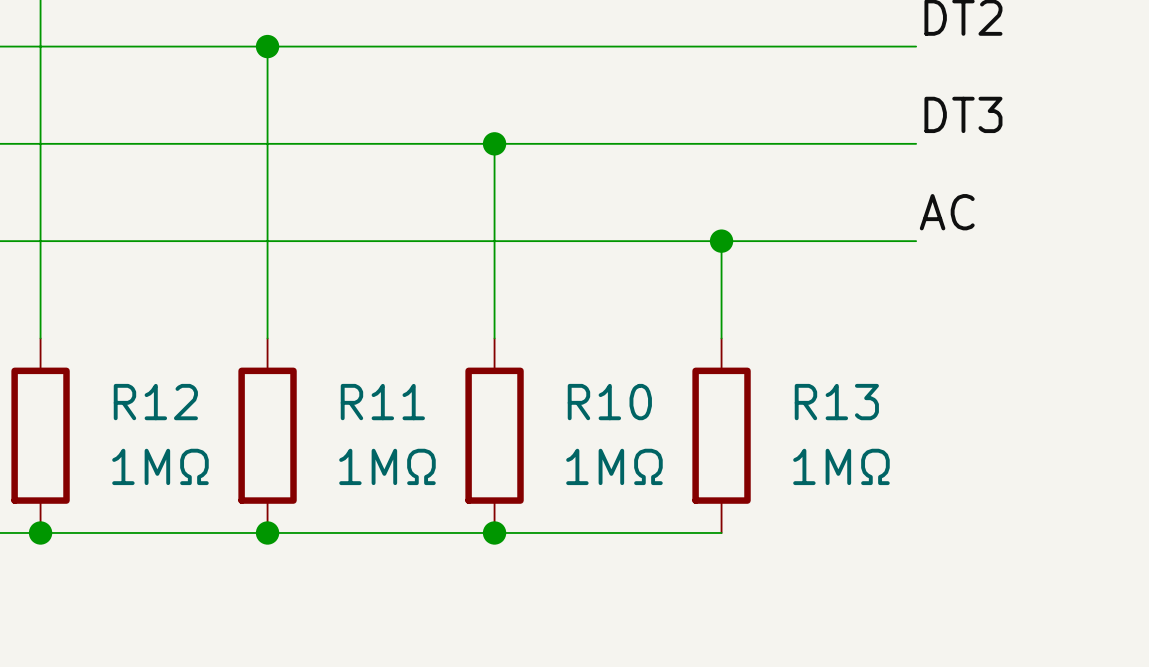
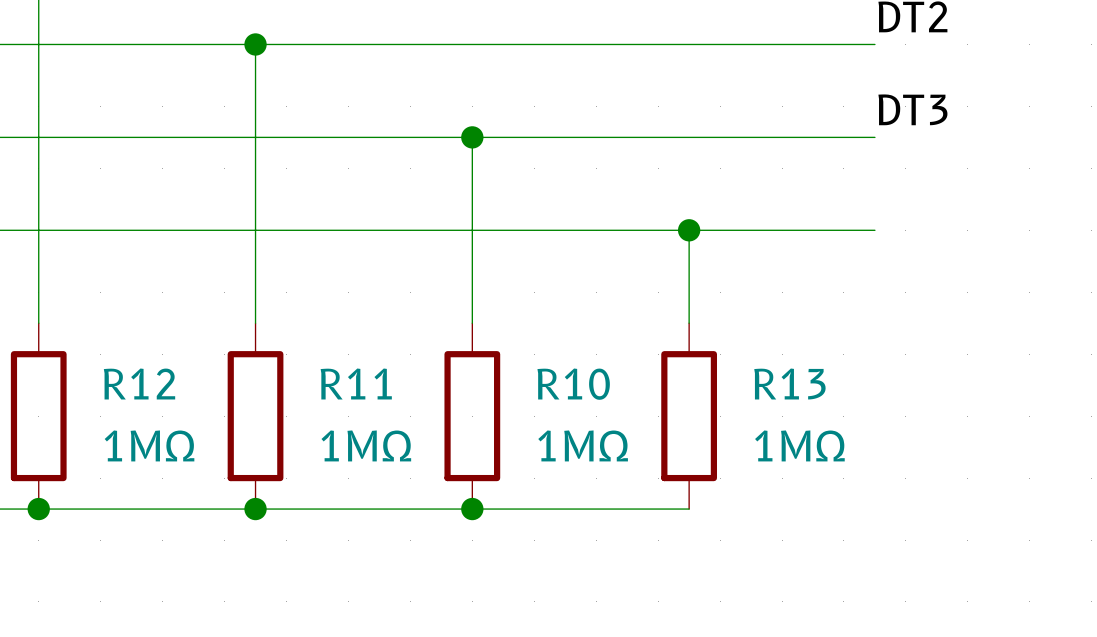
label: AC (947, 212) -> none

